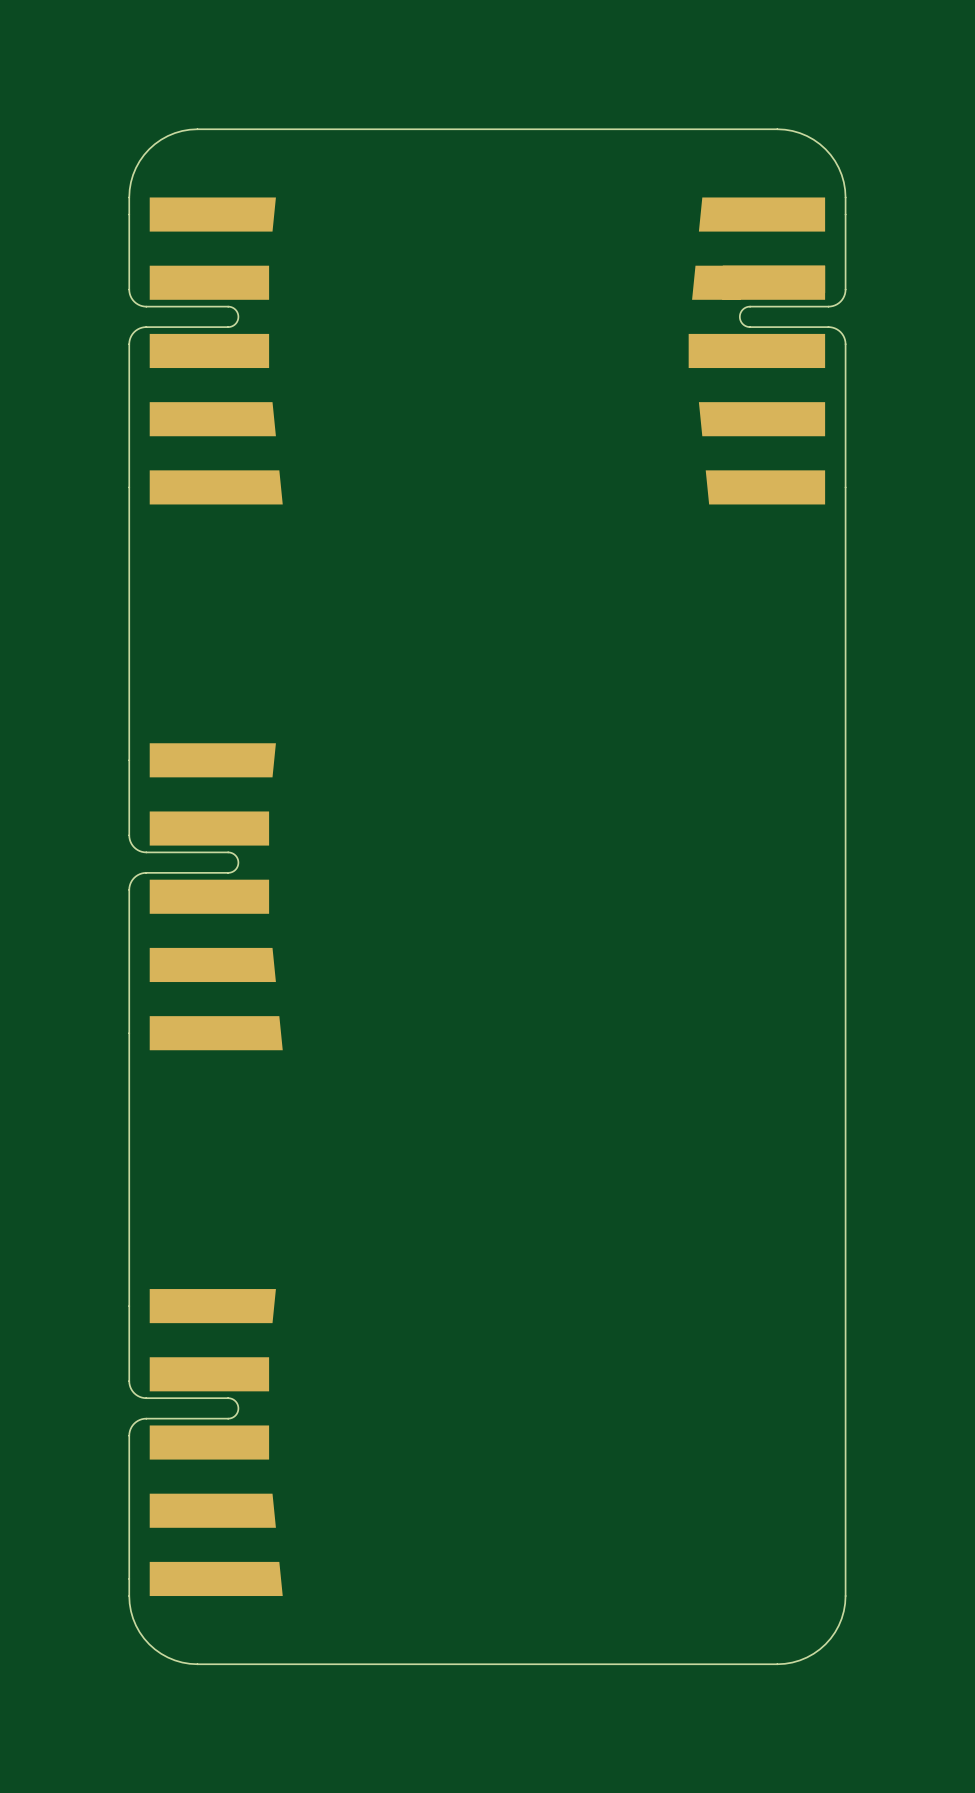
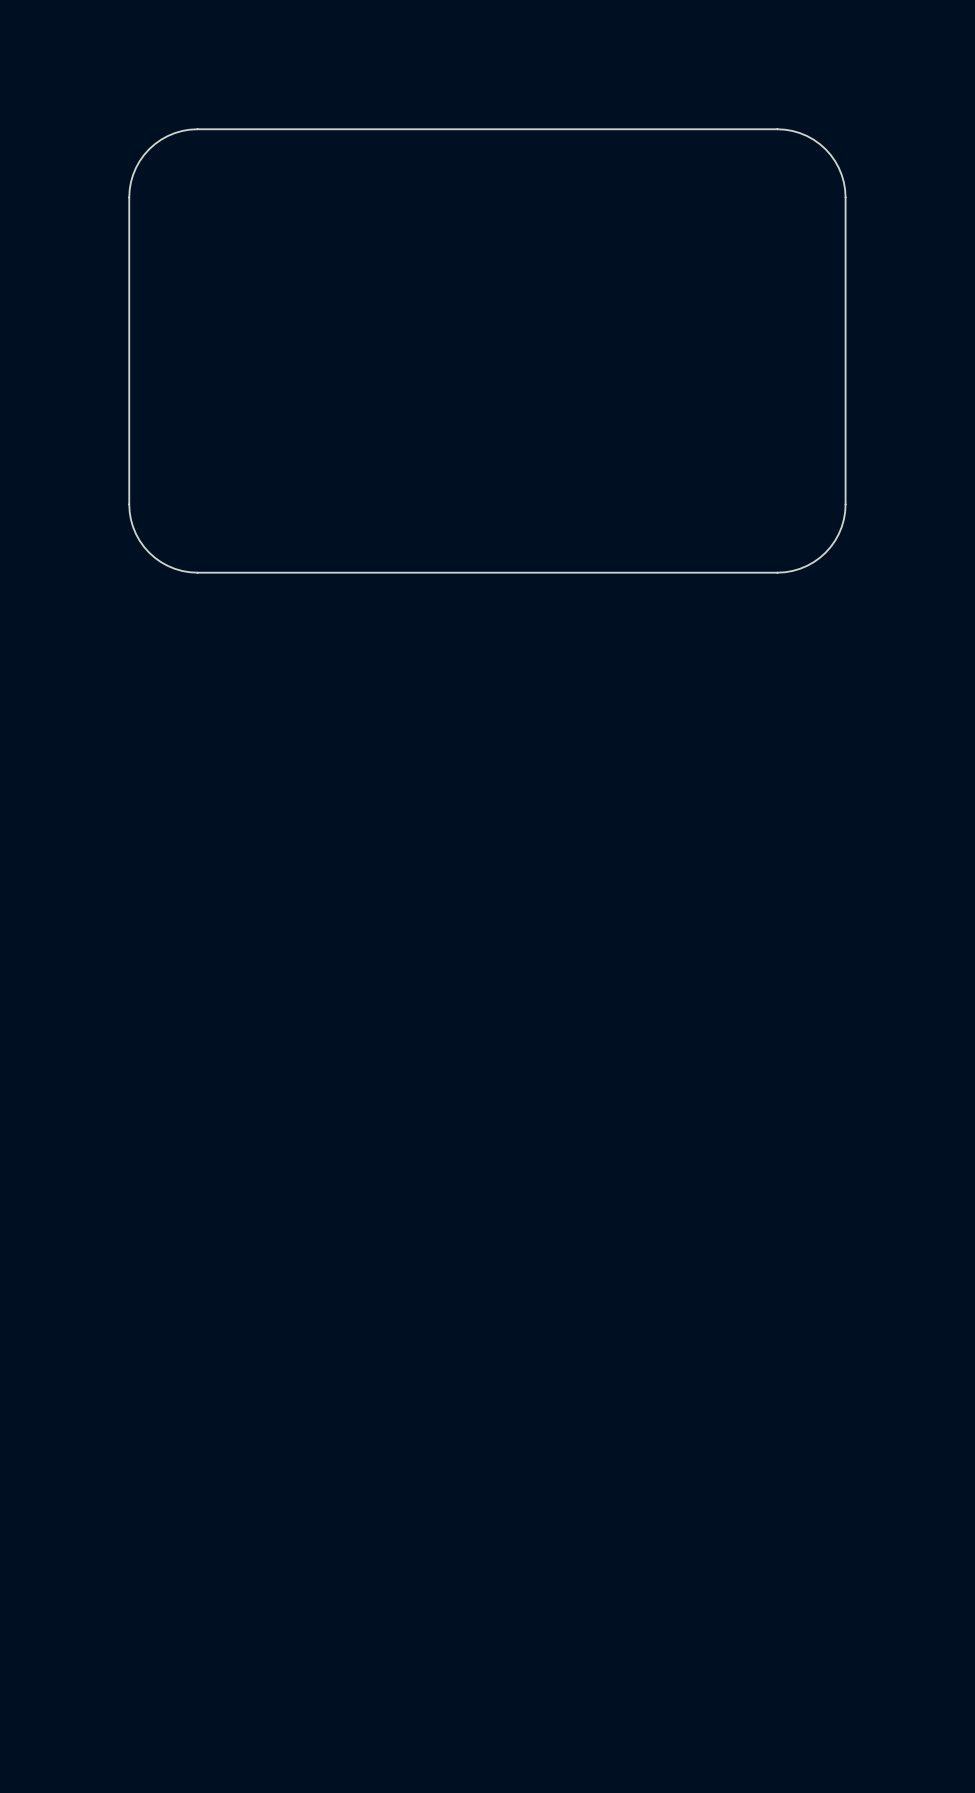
board edge: none -> (845, 214) (845, 487)
part: (205, 350) -> none
part: (767, 350) -> none
board edge: (129, 504) (129, 760) -> (129, 504) (133, 527) (139, 540) (149, 552) (161, 562) (174, 568) (197, 572) (784, 572) (806, 565) (825, 552) (838, 534) (843, 519) (845, 504)
board edge: (845, 504) (845, 1596) (843, 1611) (835, 1632) (825, 1644) (806, 1657) (792, 1662) (777, 1664) (189, 1663) (174, 1660) (161, 1653) (144, 1638) (136, 1625) (130, 1611) (129, 1578) -> none
part: (205, 896) -> none
board edge: (129, 1033) (129, 1306) -> (129, 214) (129, 487)
part: (205, 1442) -> none

